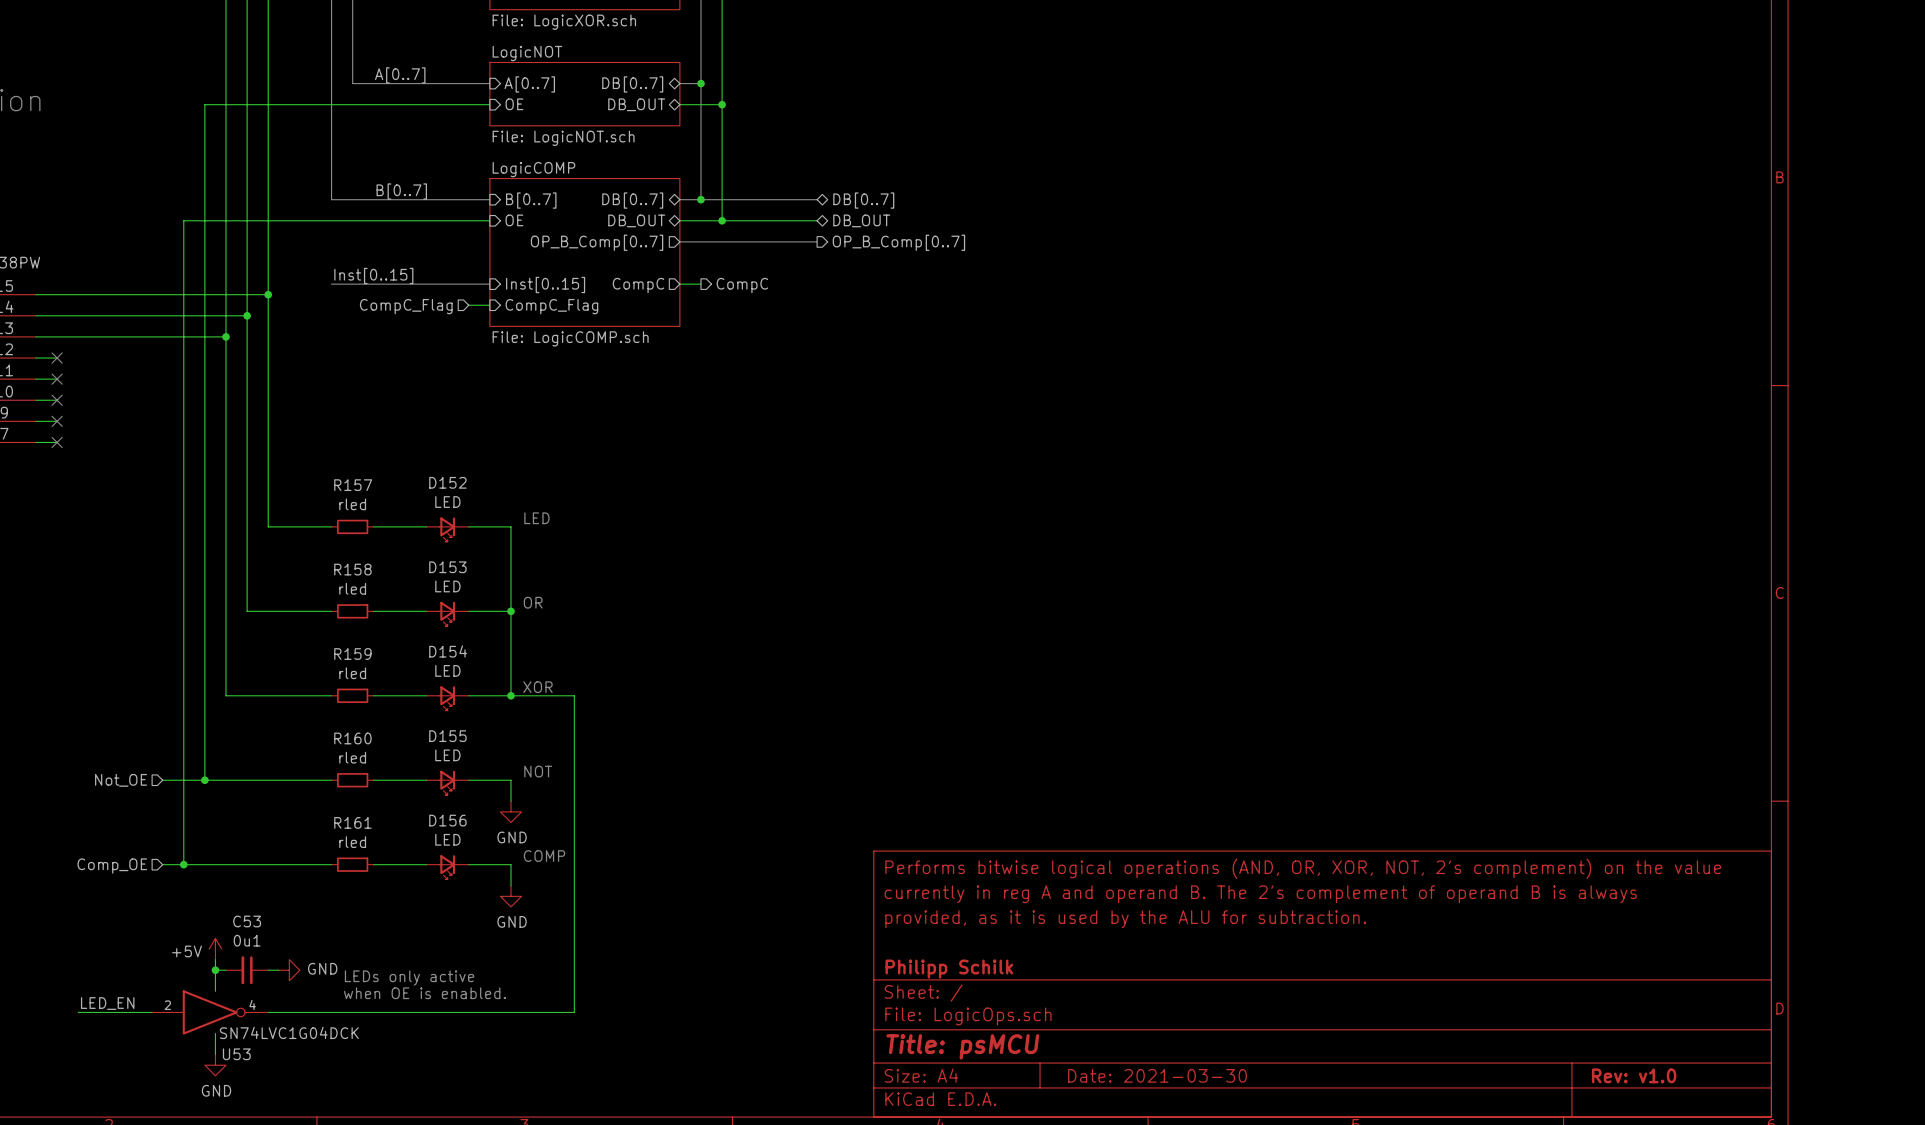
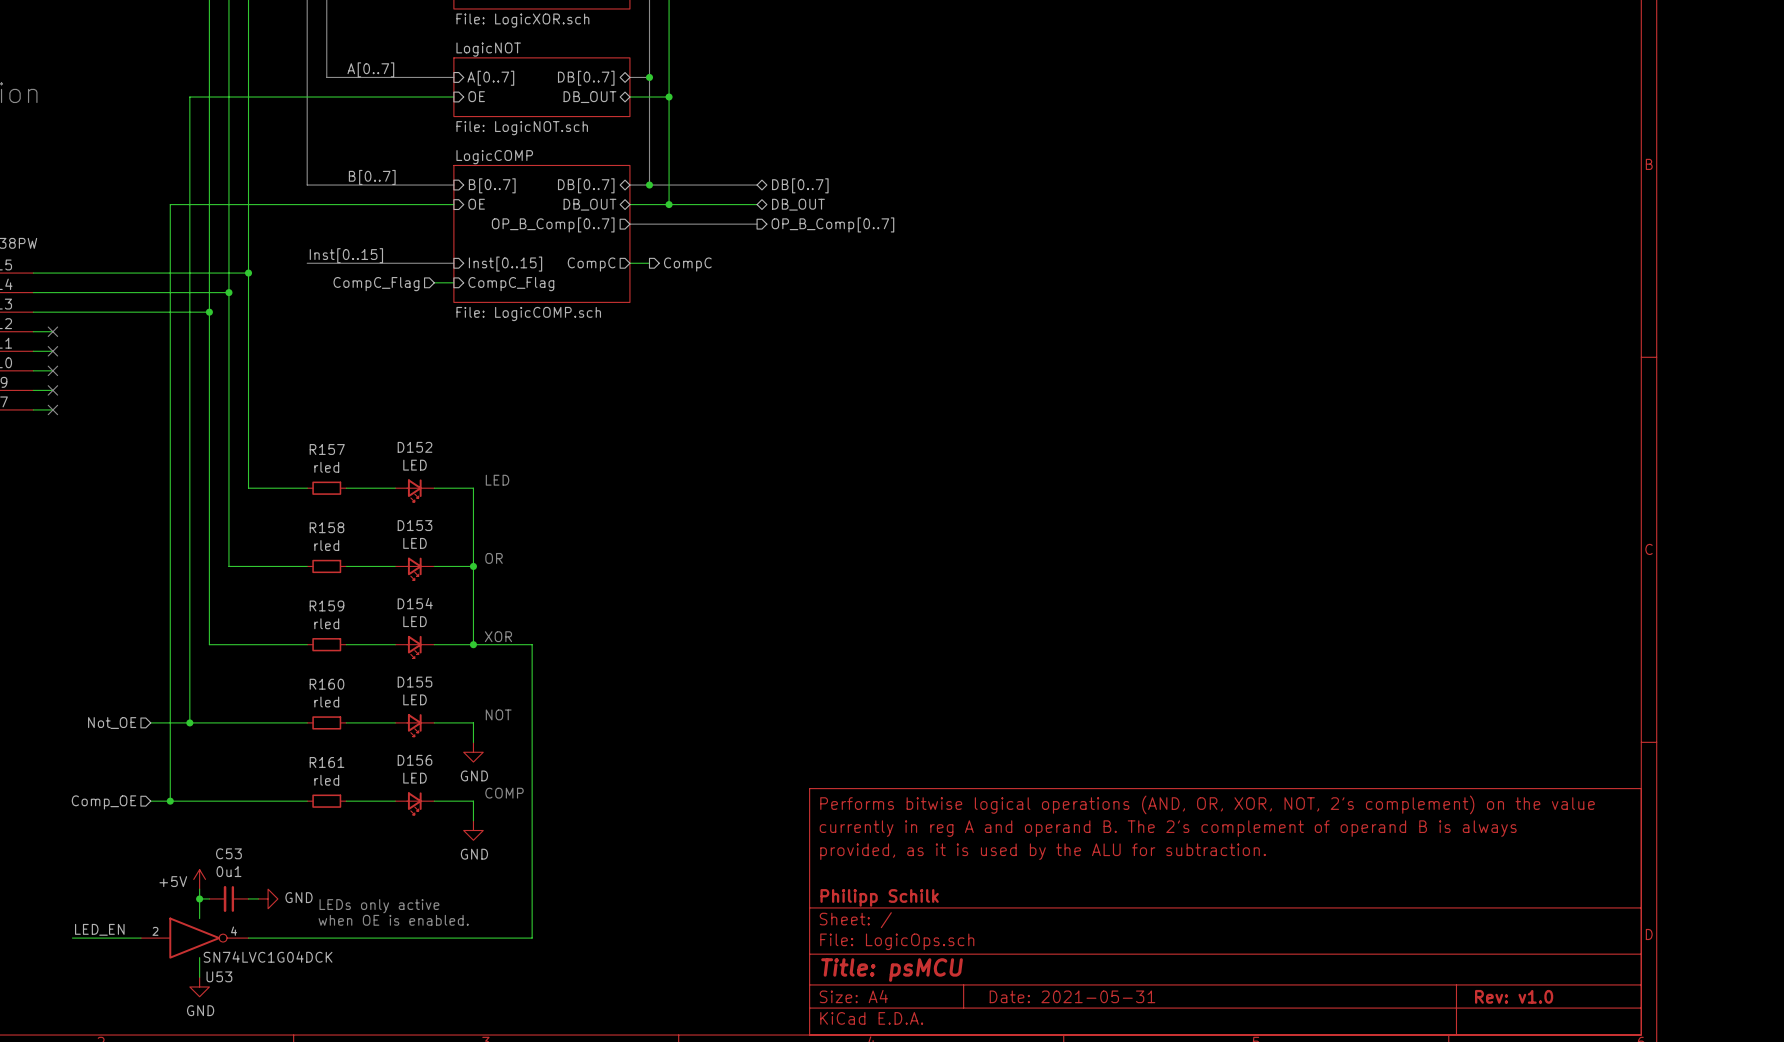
title block: Date: 2021-03-30 (1157, 1075) -> Date: 2021-05-31 (1072, 996)

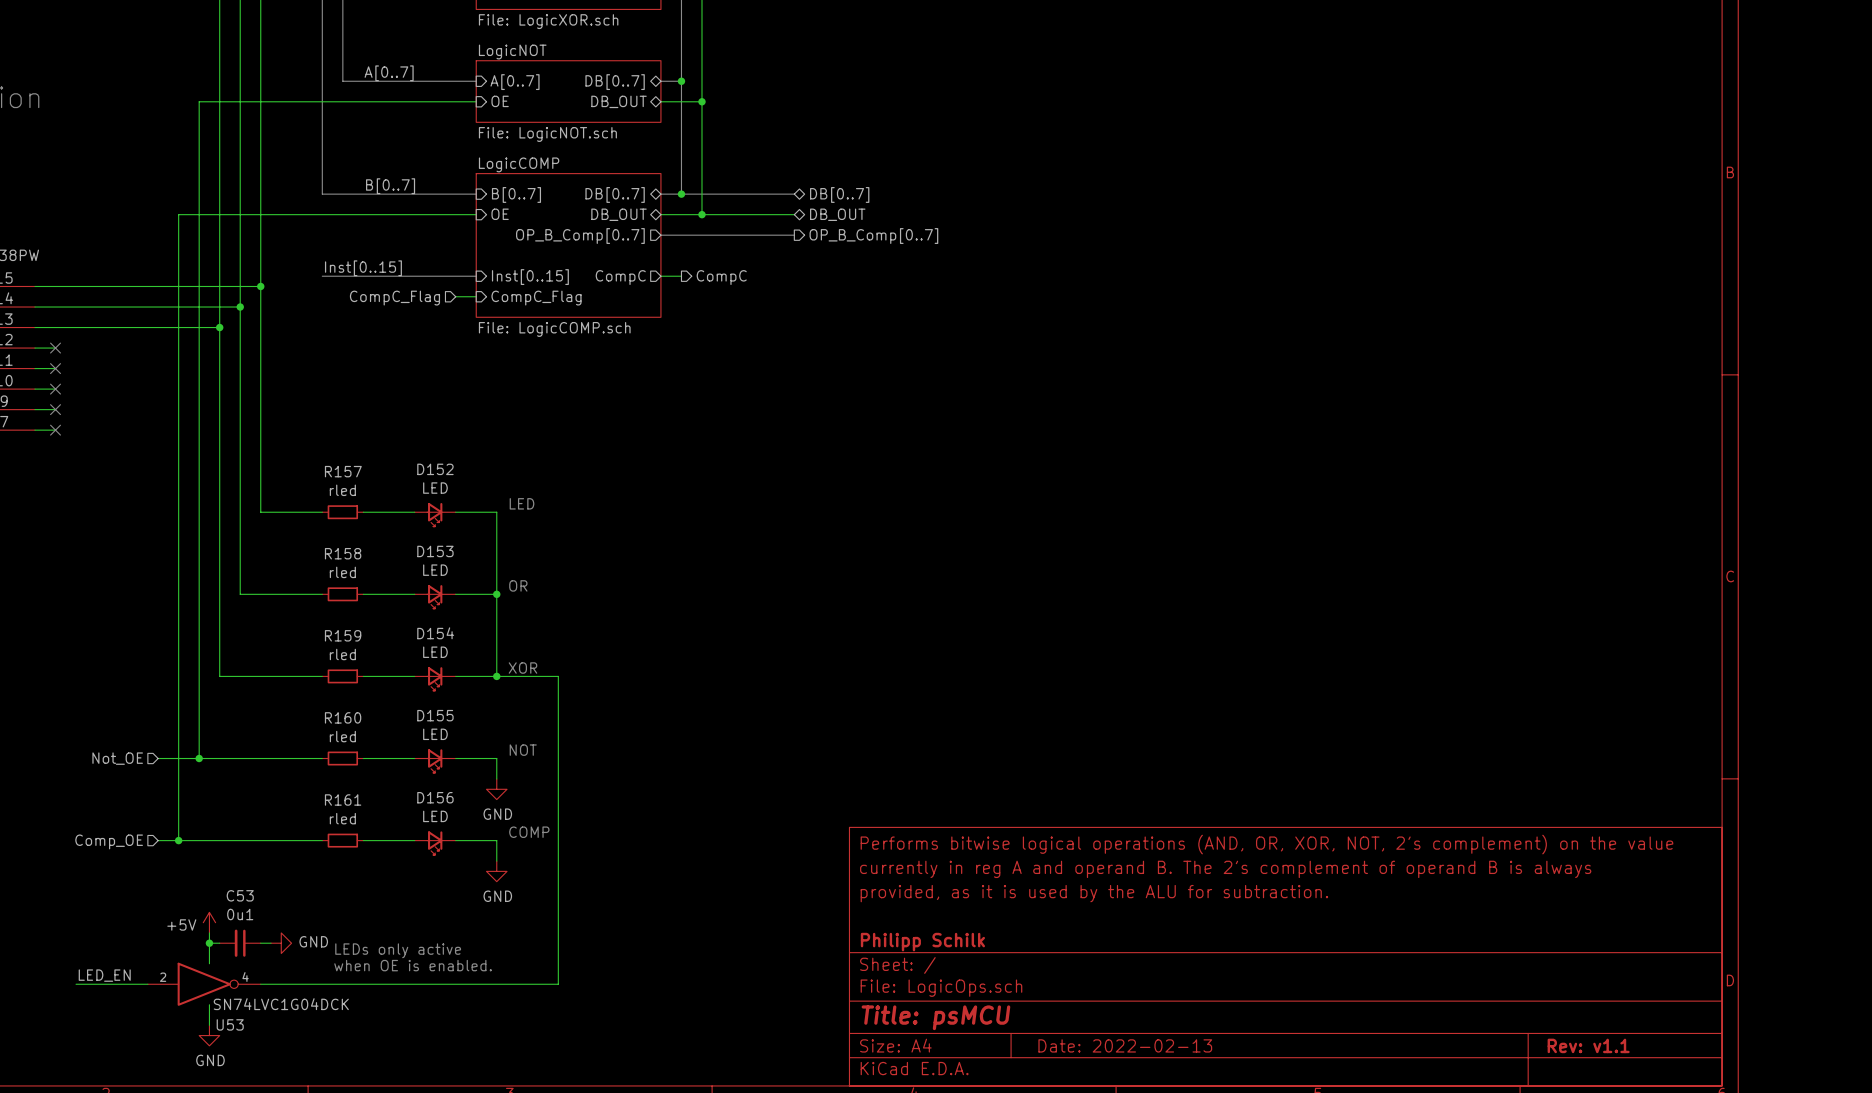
title block: Date: 2021-05-31 (1072, 996) -> Date: 2022-02-13 (1125, 1045)
title block: Rev: v1.0 (1514, 996) -> Rev: v1.1 (1588, 1045)

